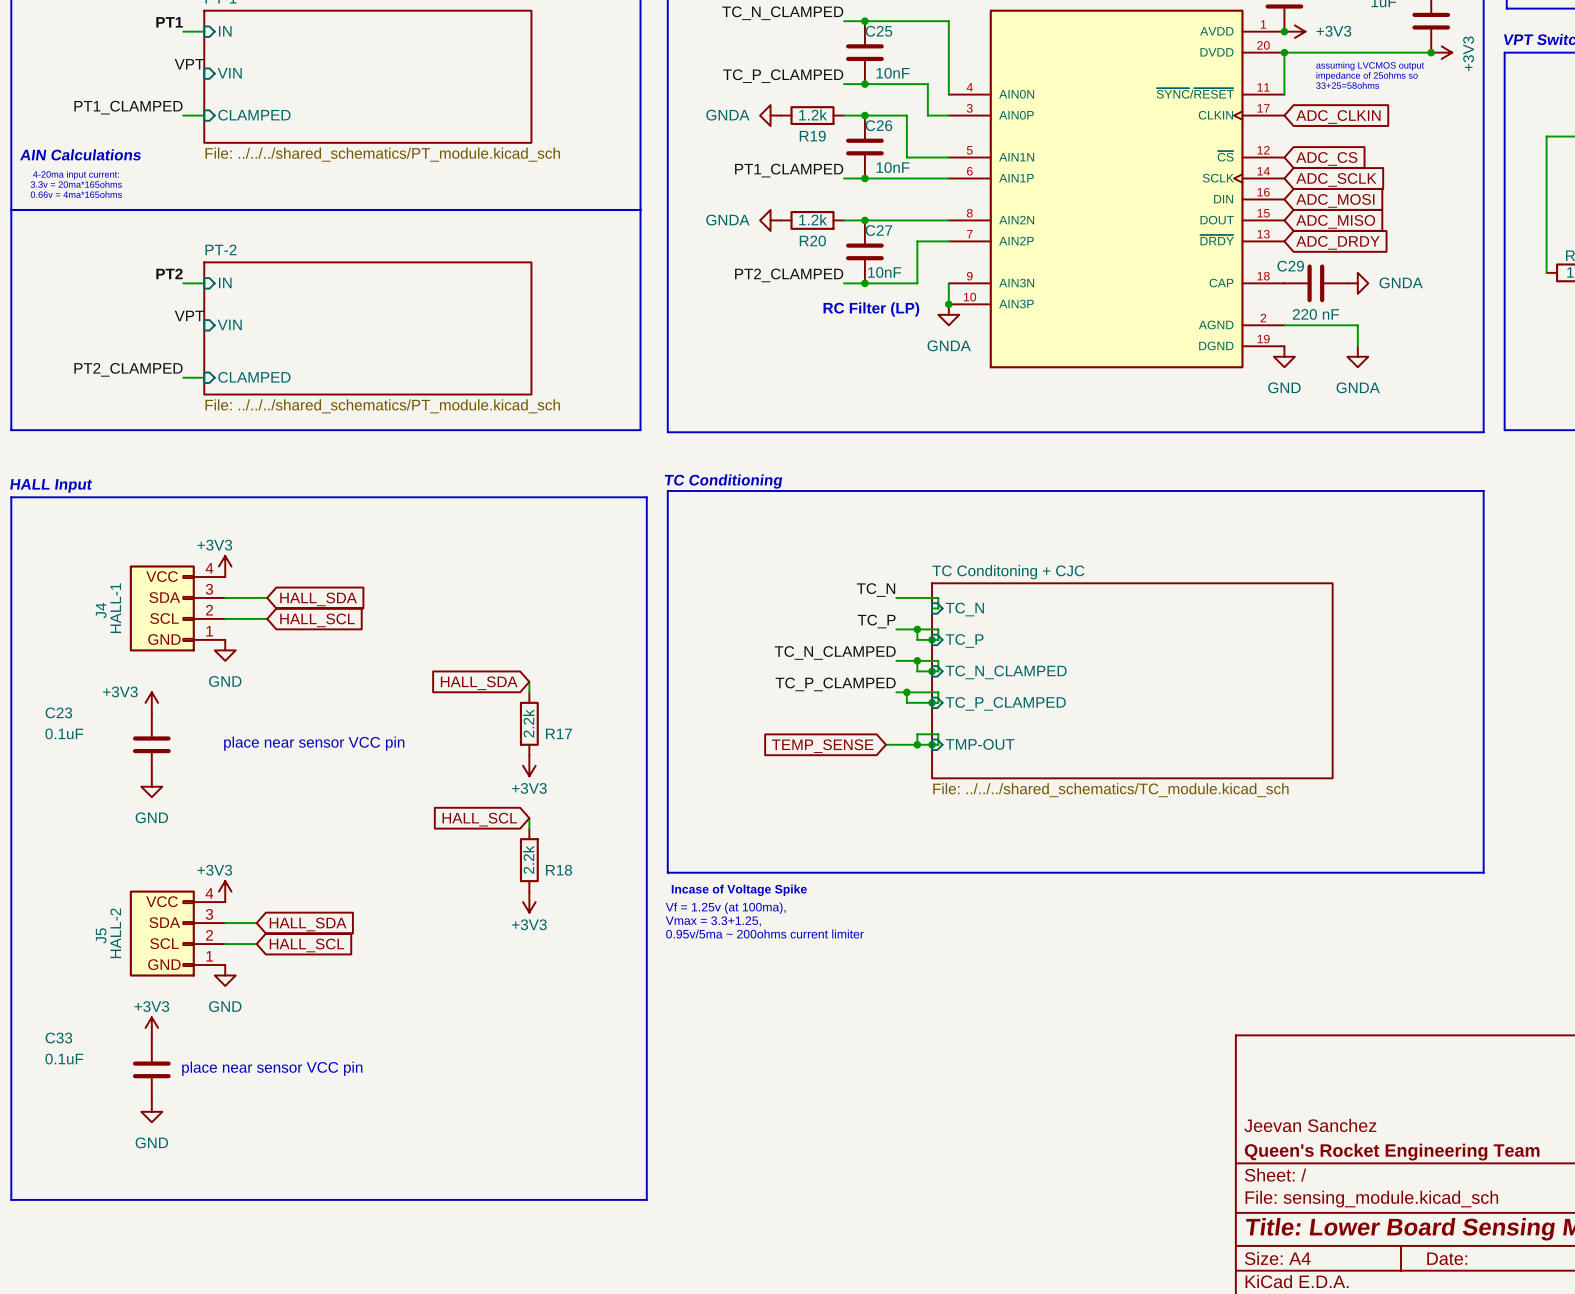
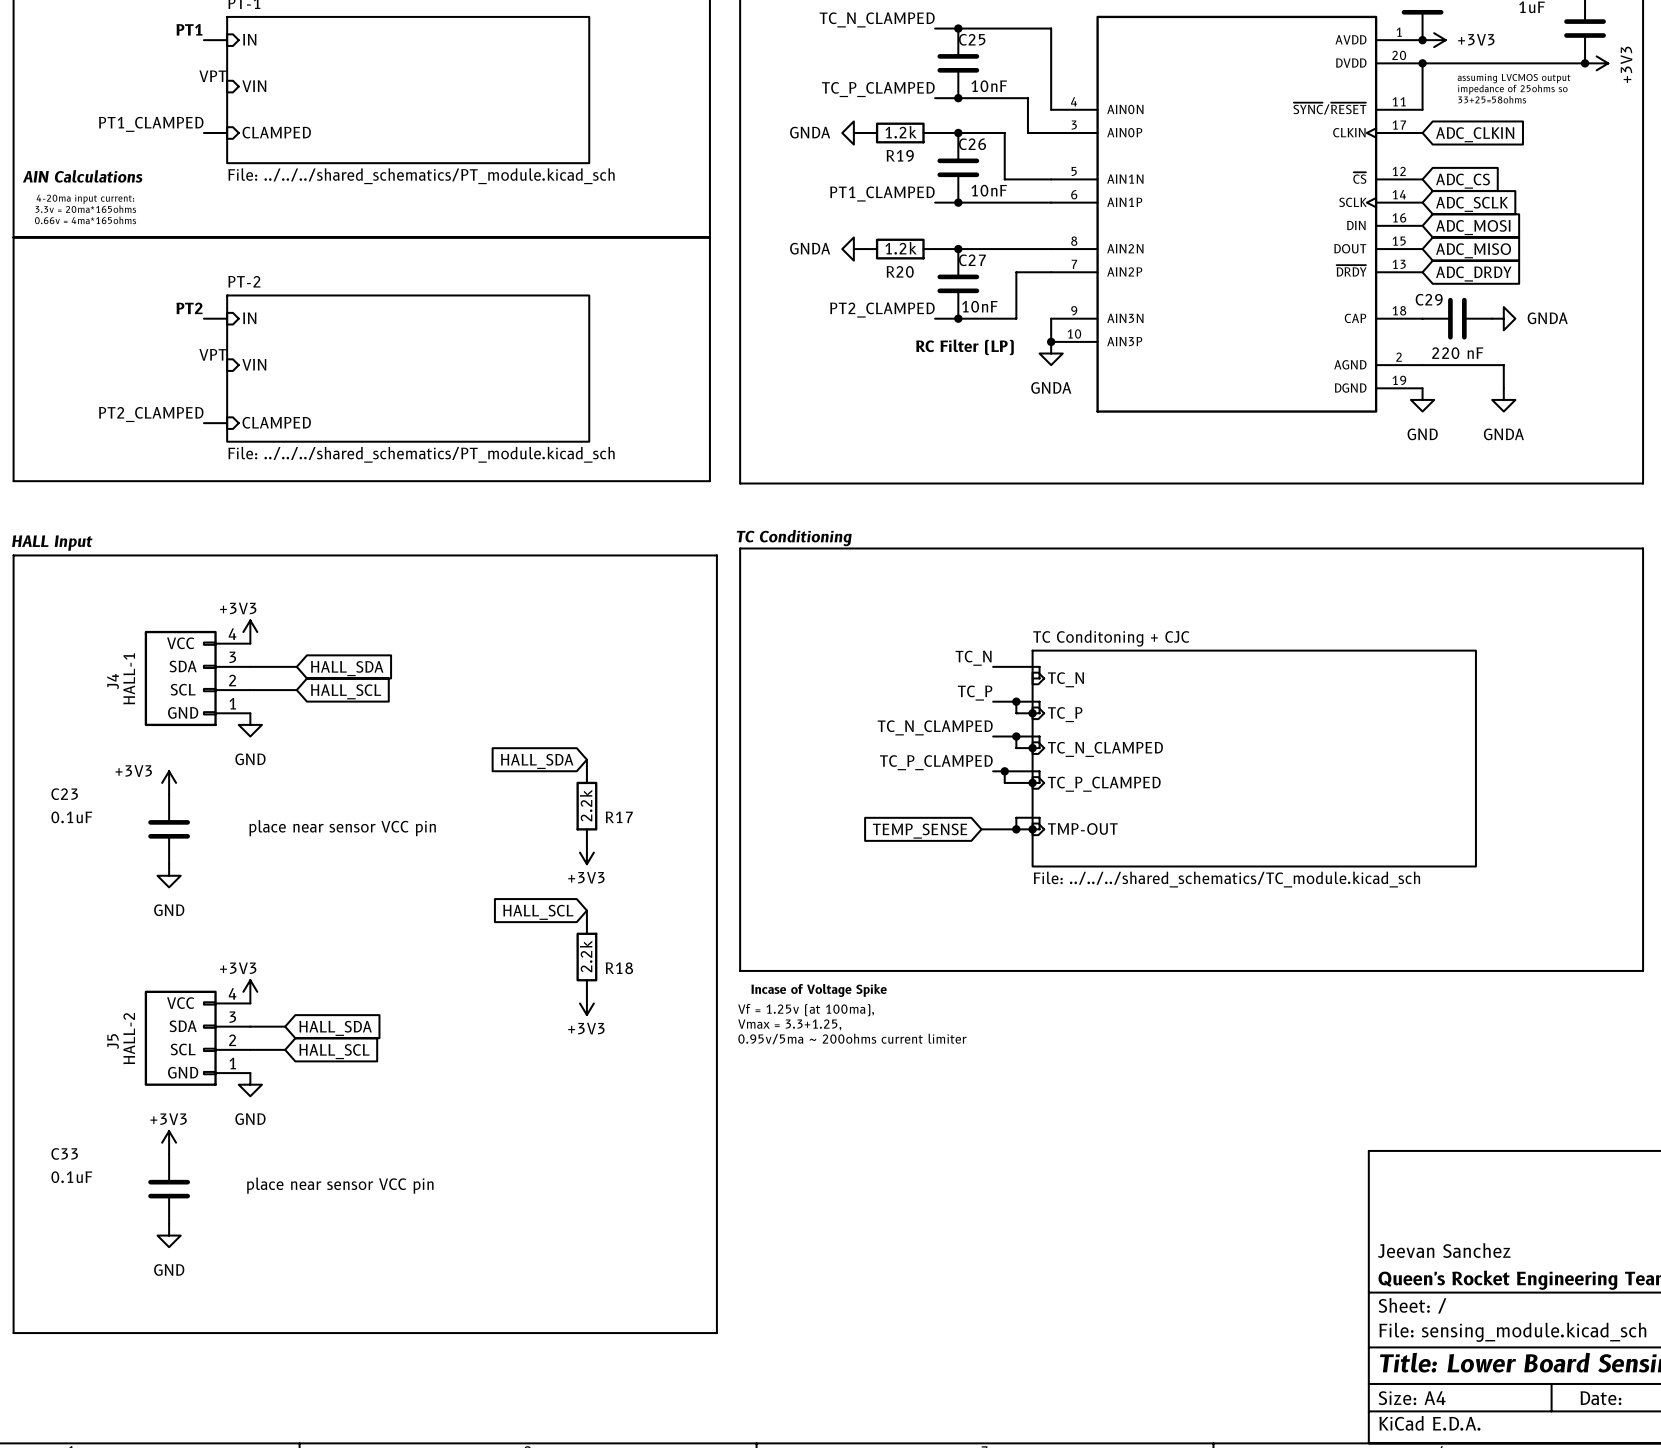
text position: place near sensor VCC pin (272, 1068) -> place near sensor VCC pin (340, 1185)

